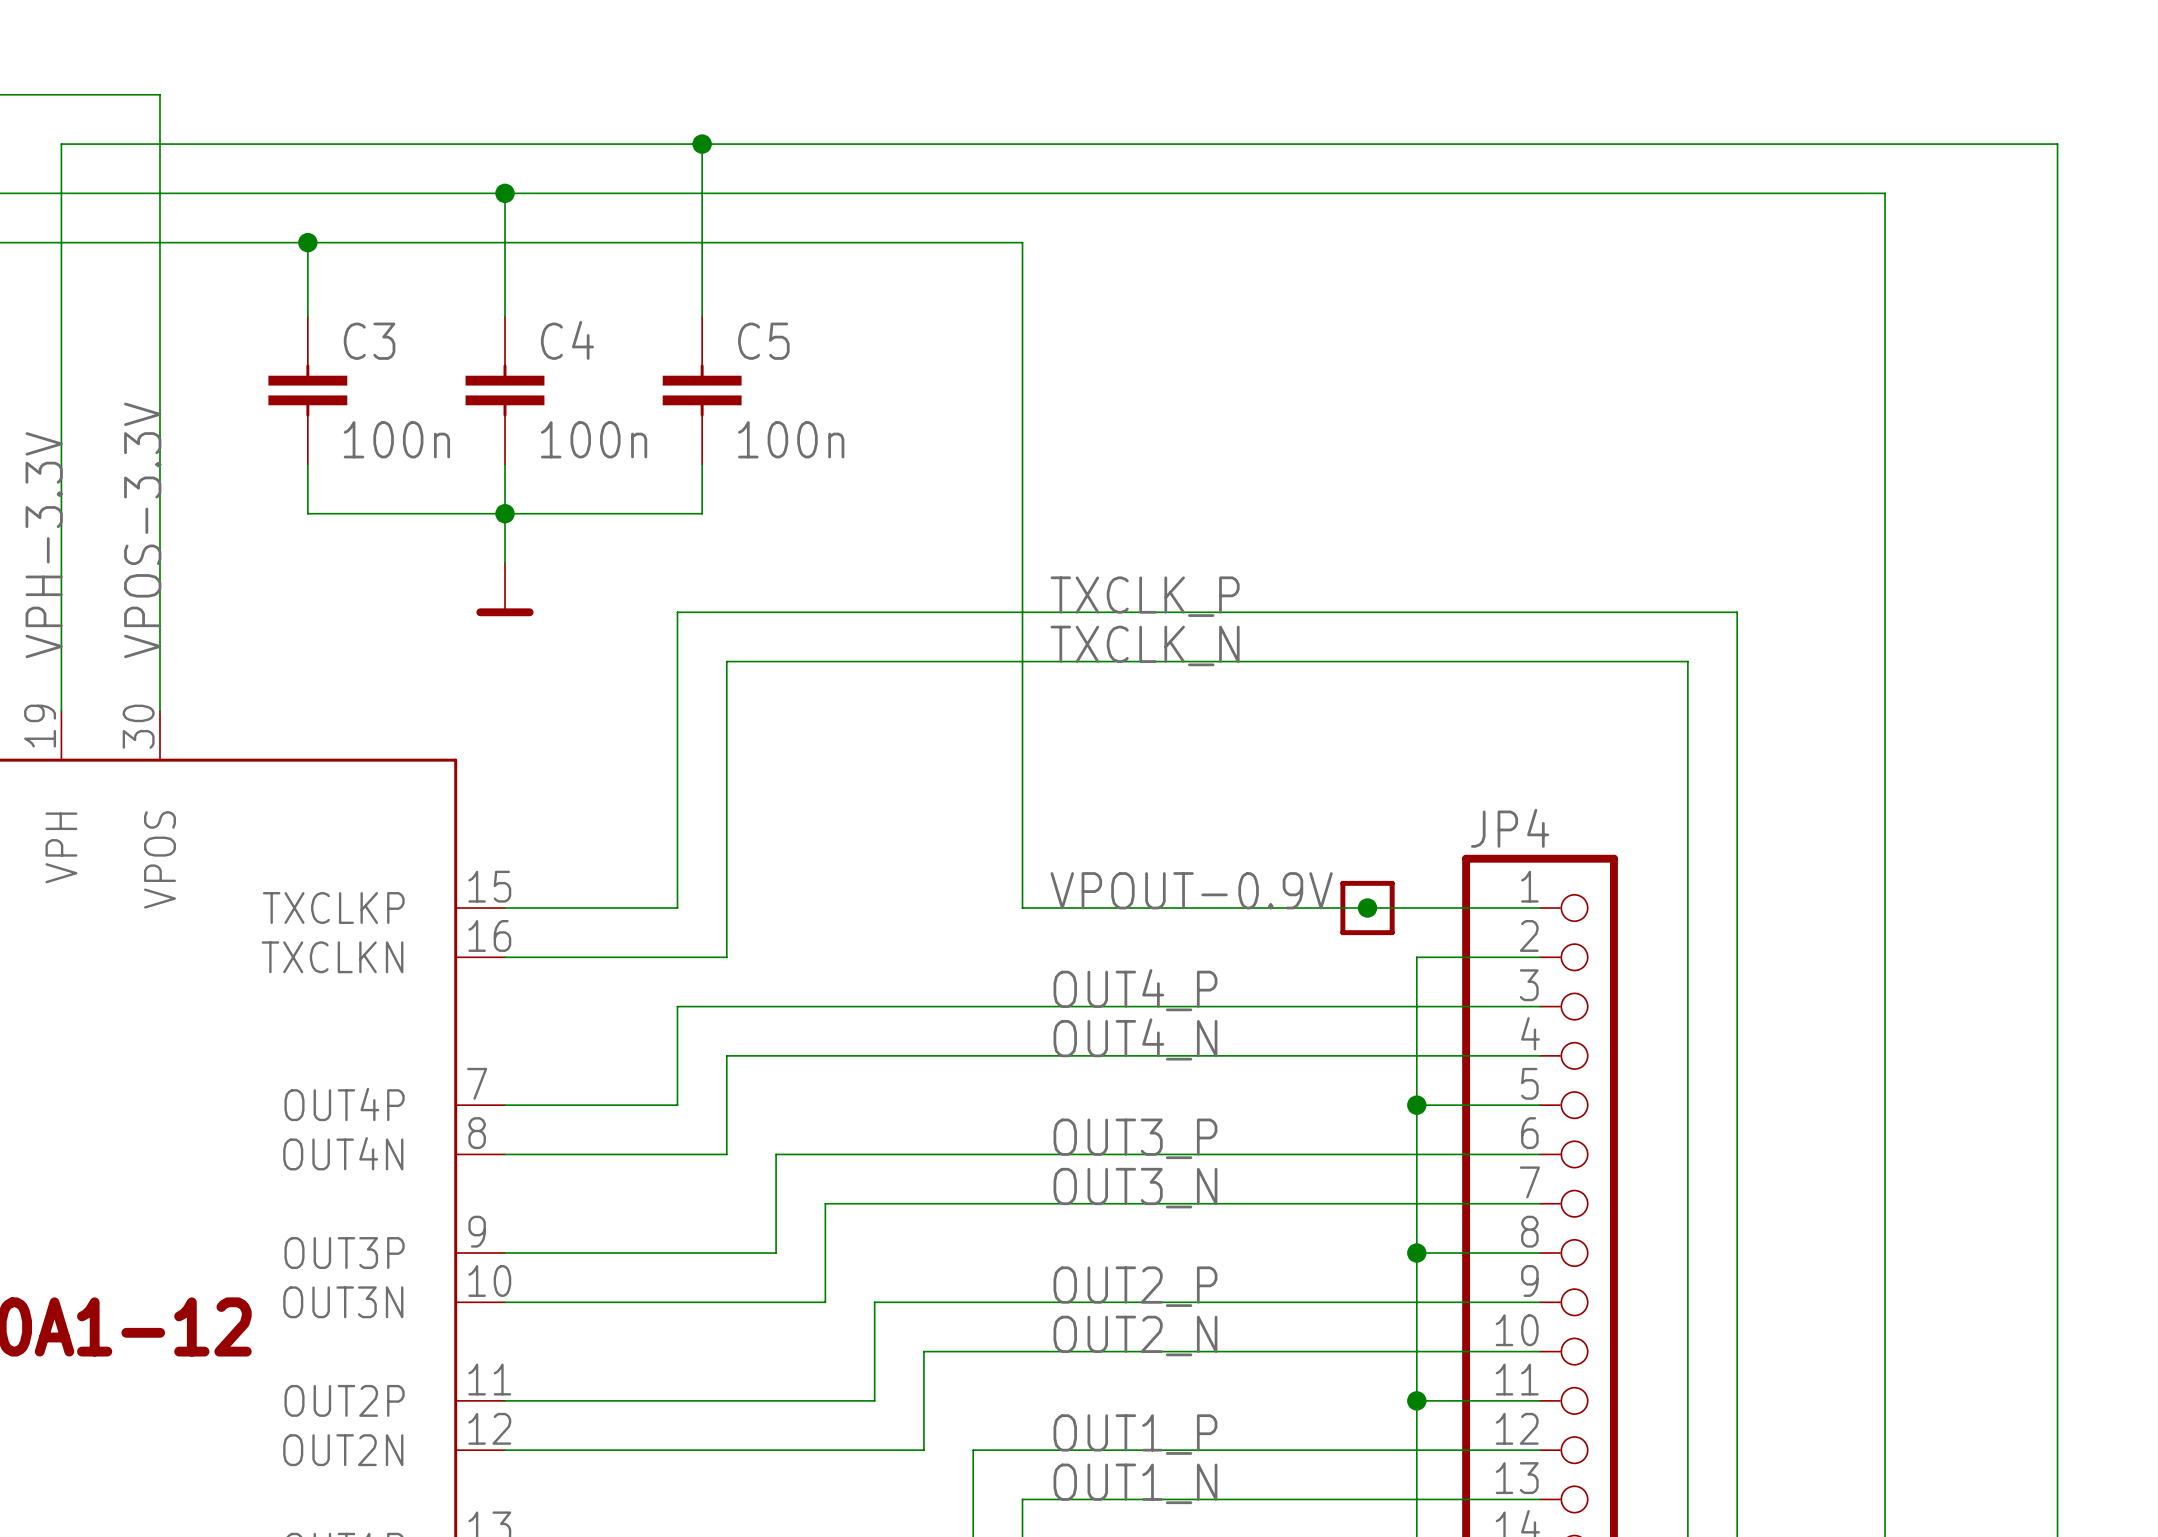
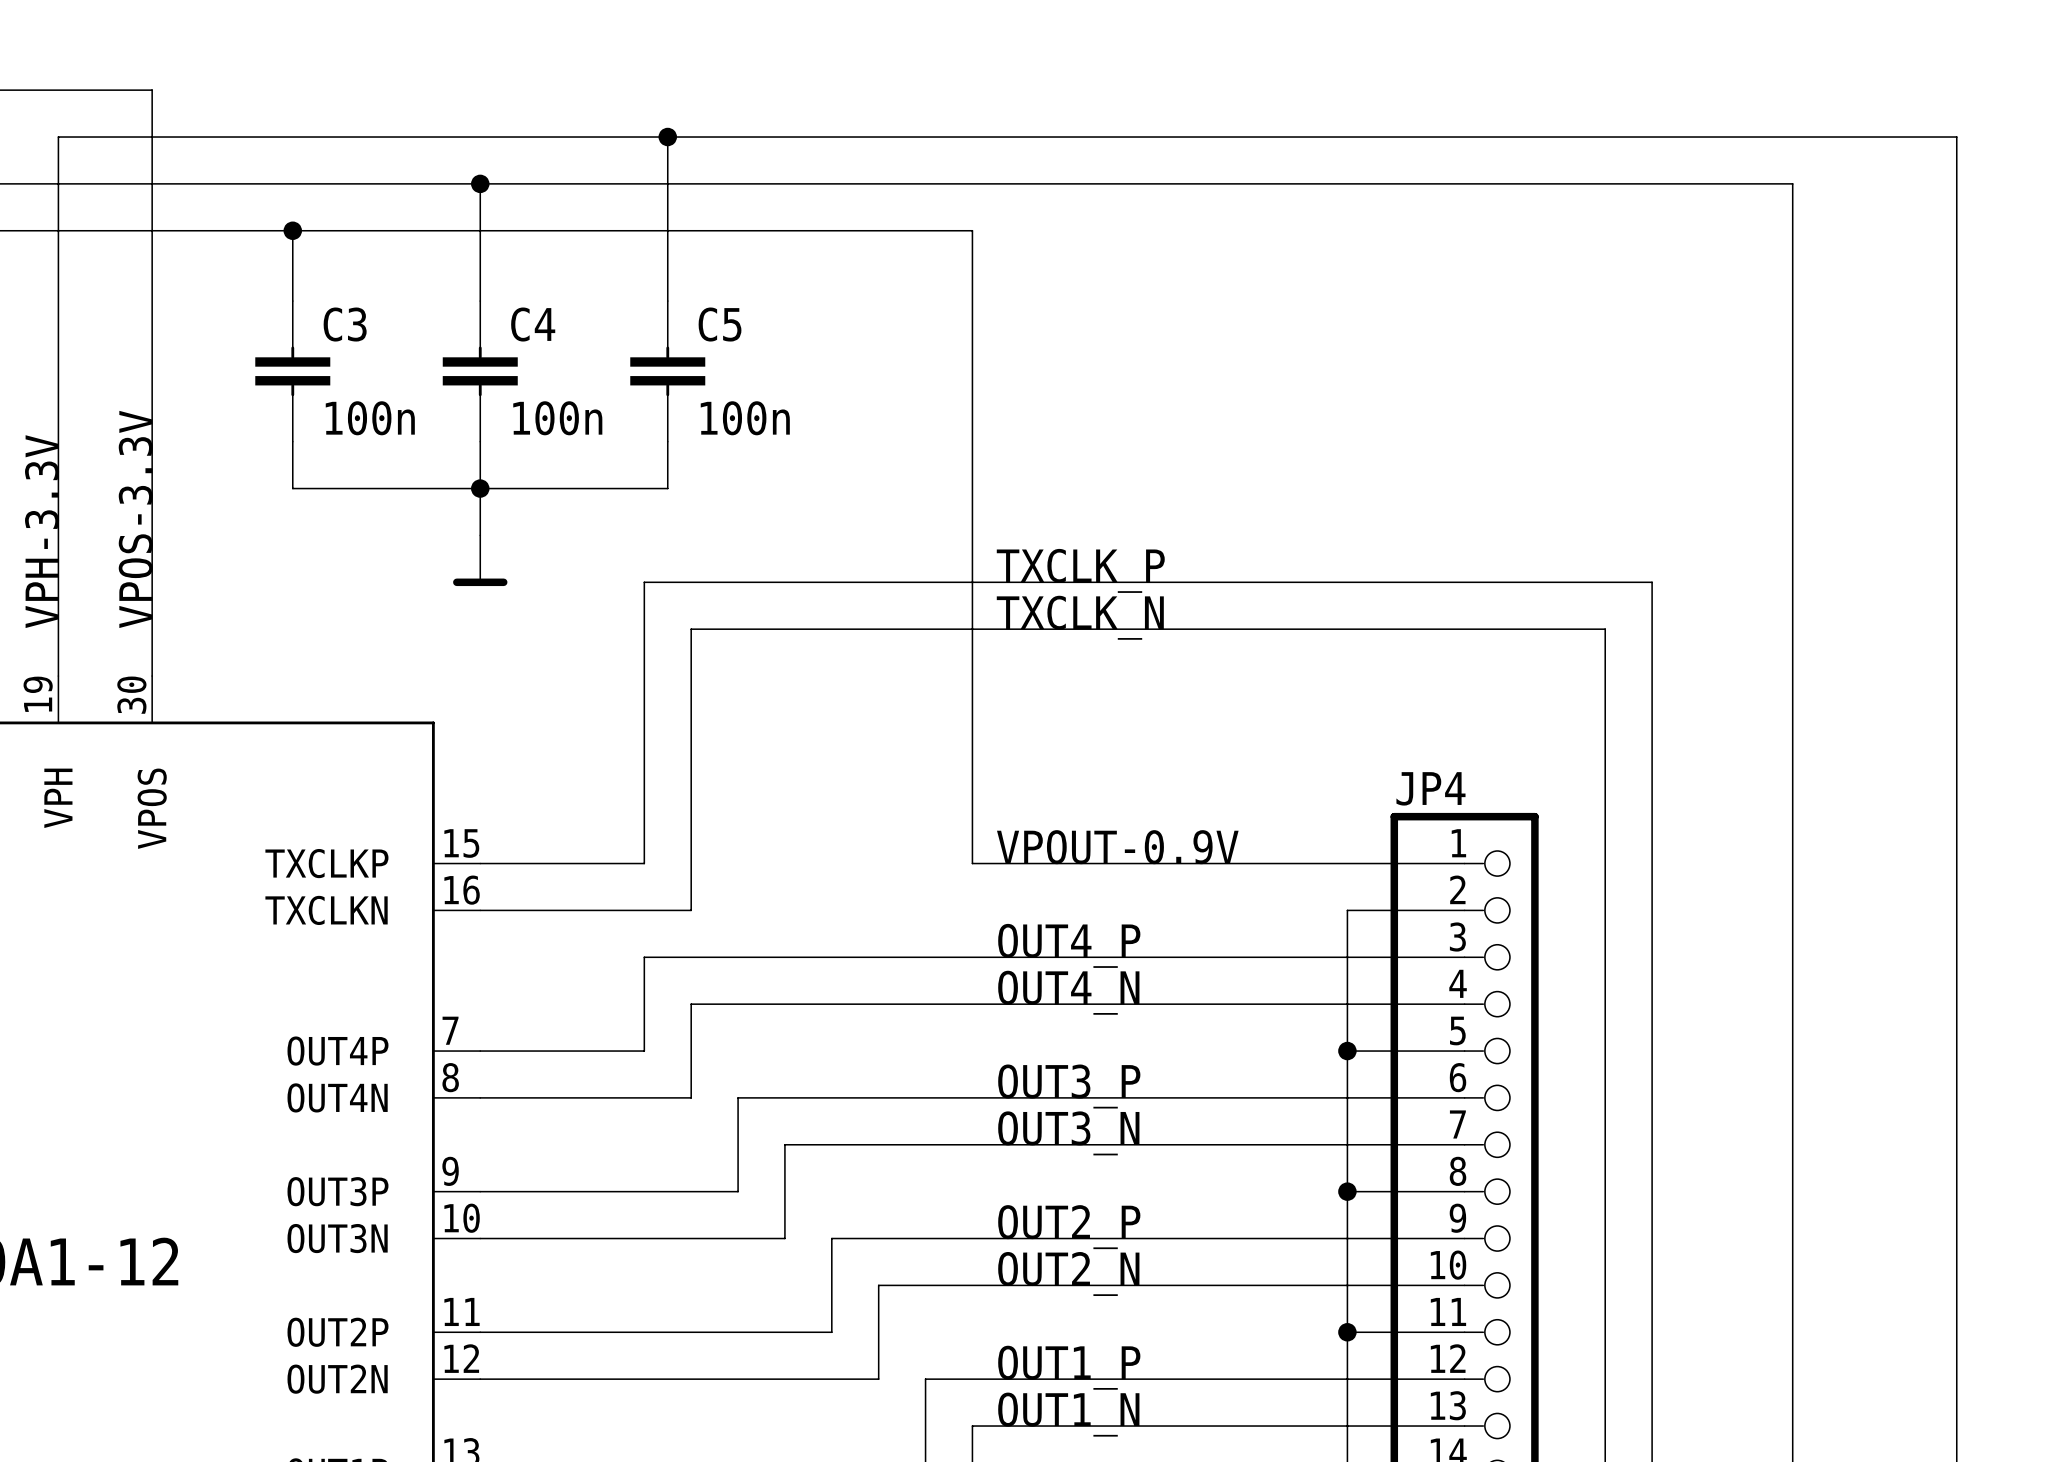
part: (1367, 908) -> none
junction: (1367, 908) -> none

